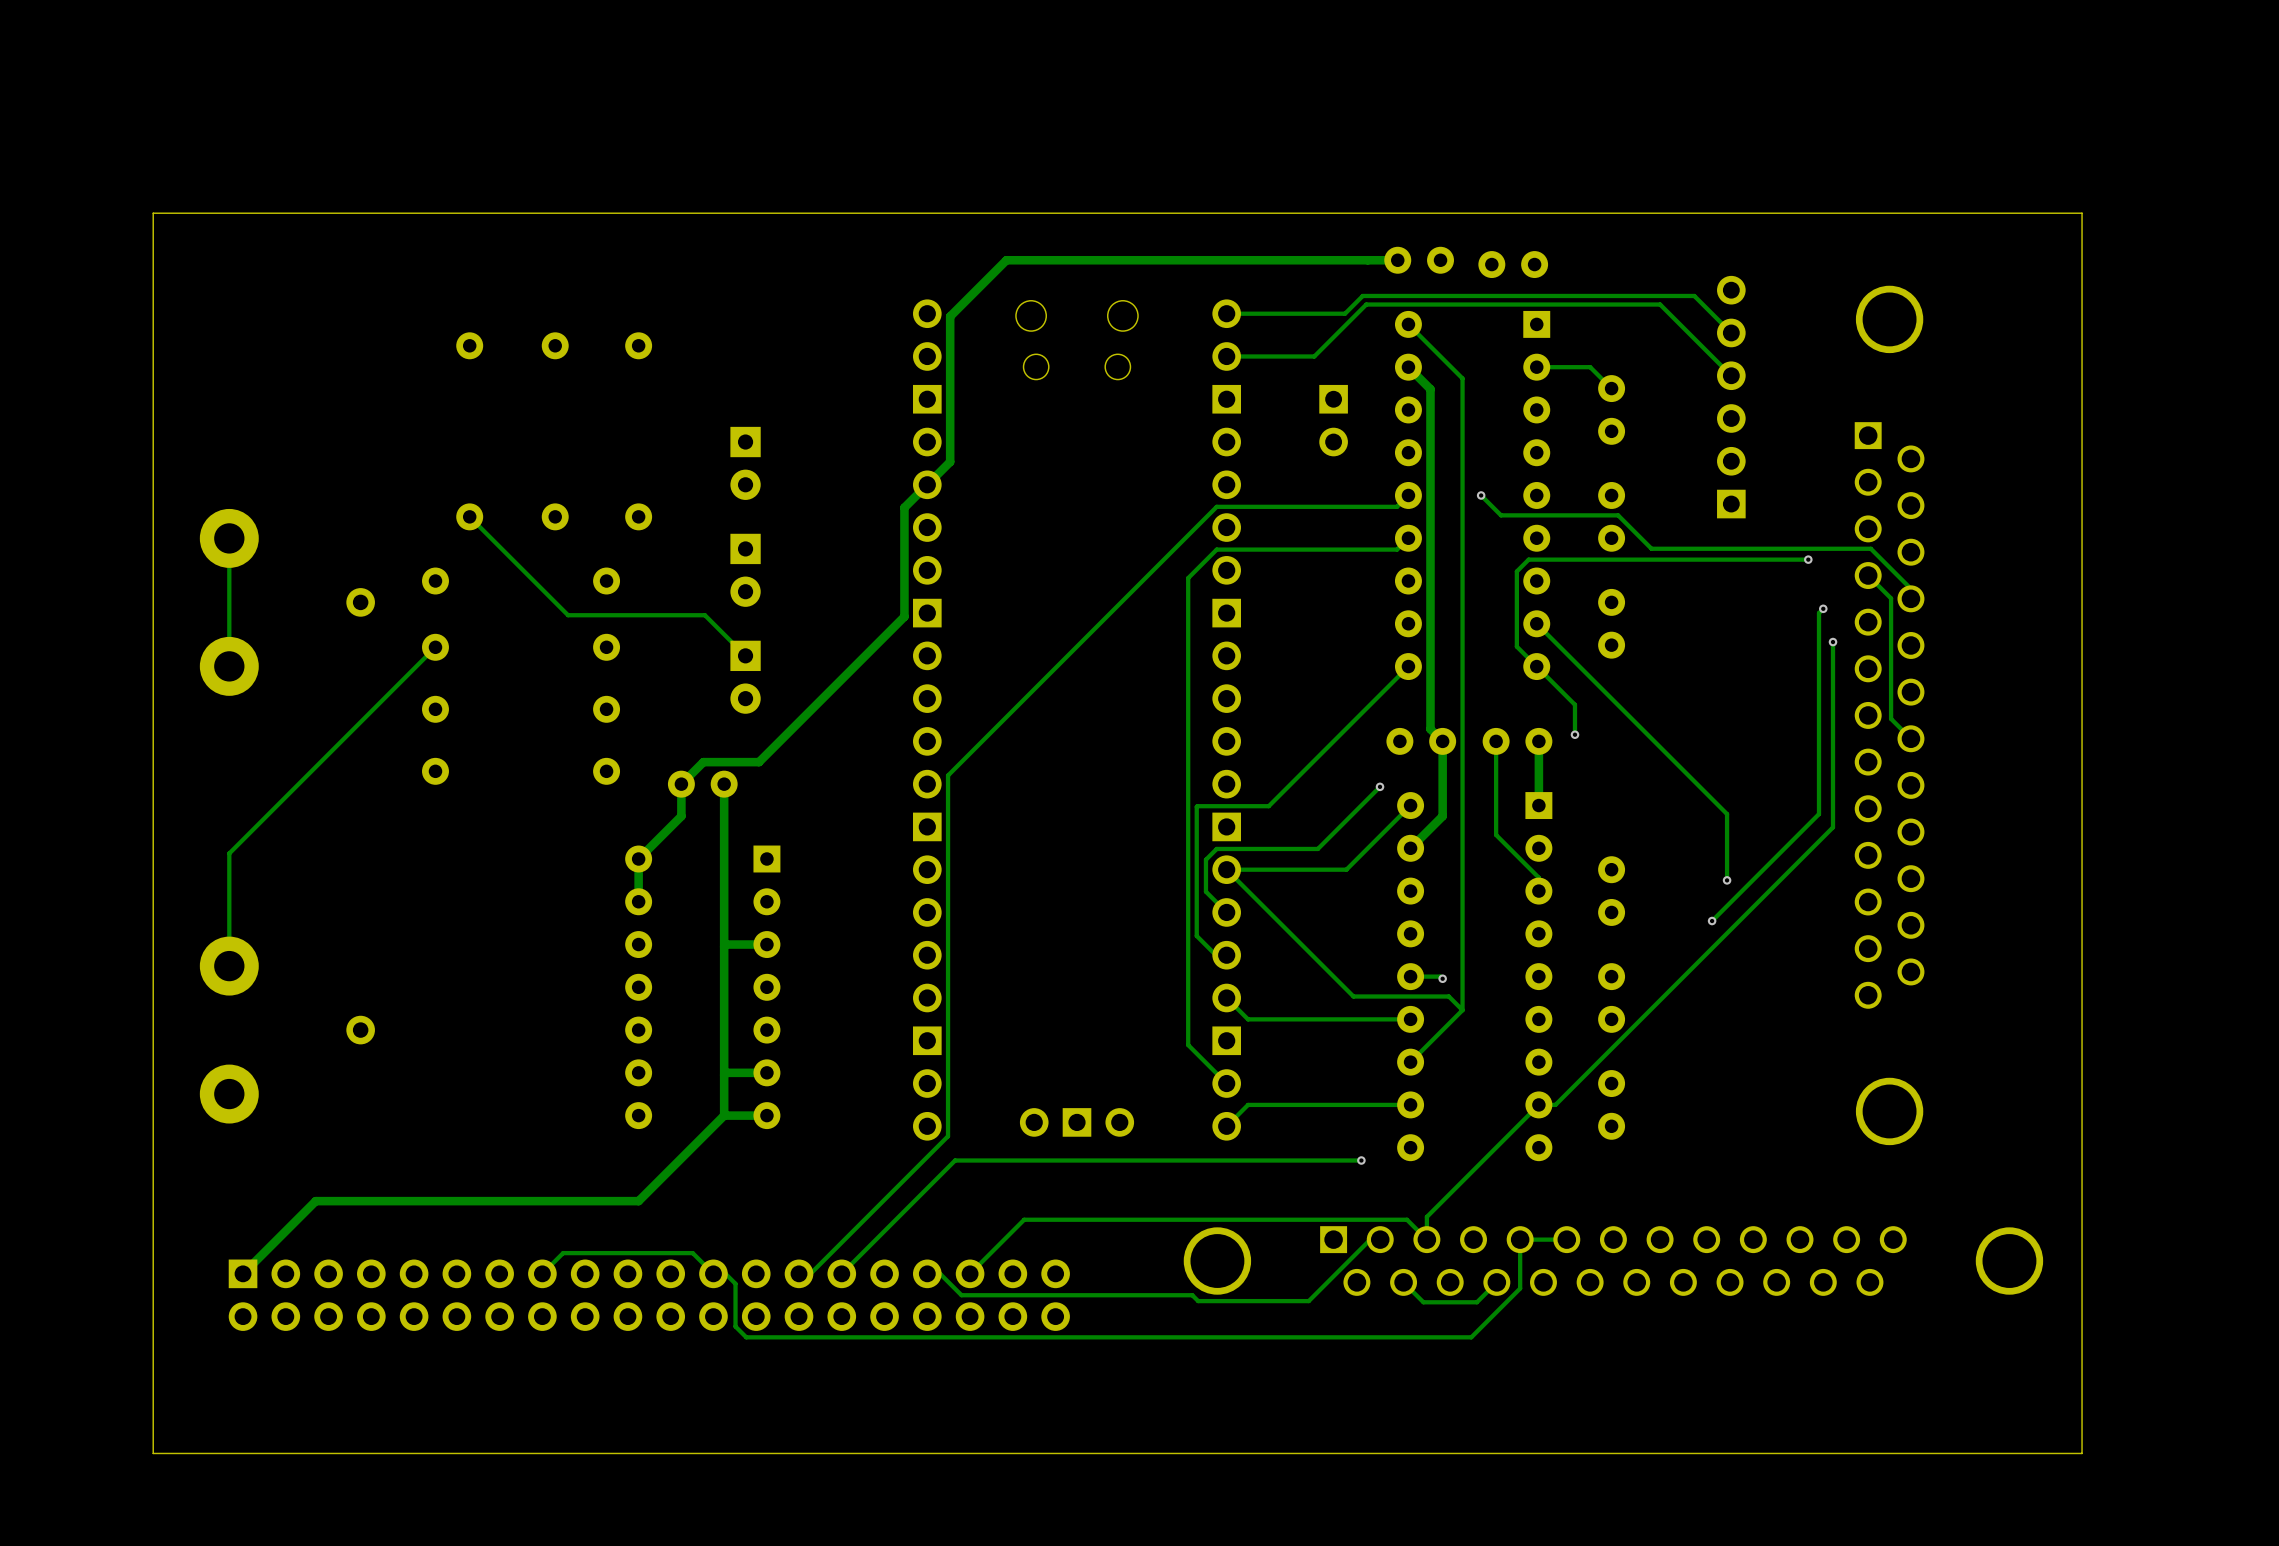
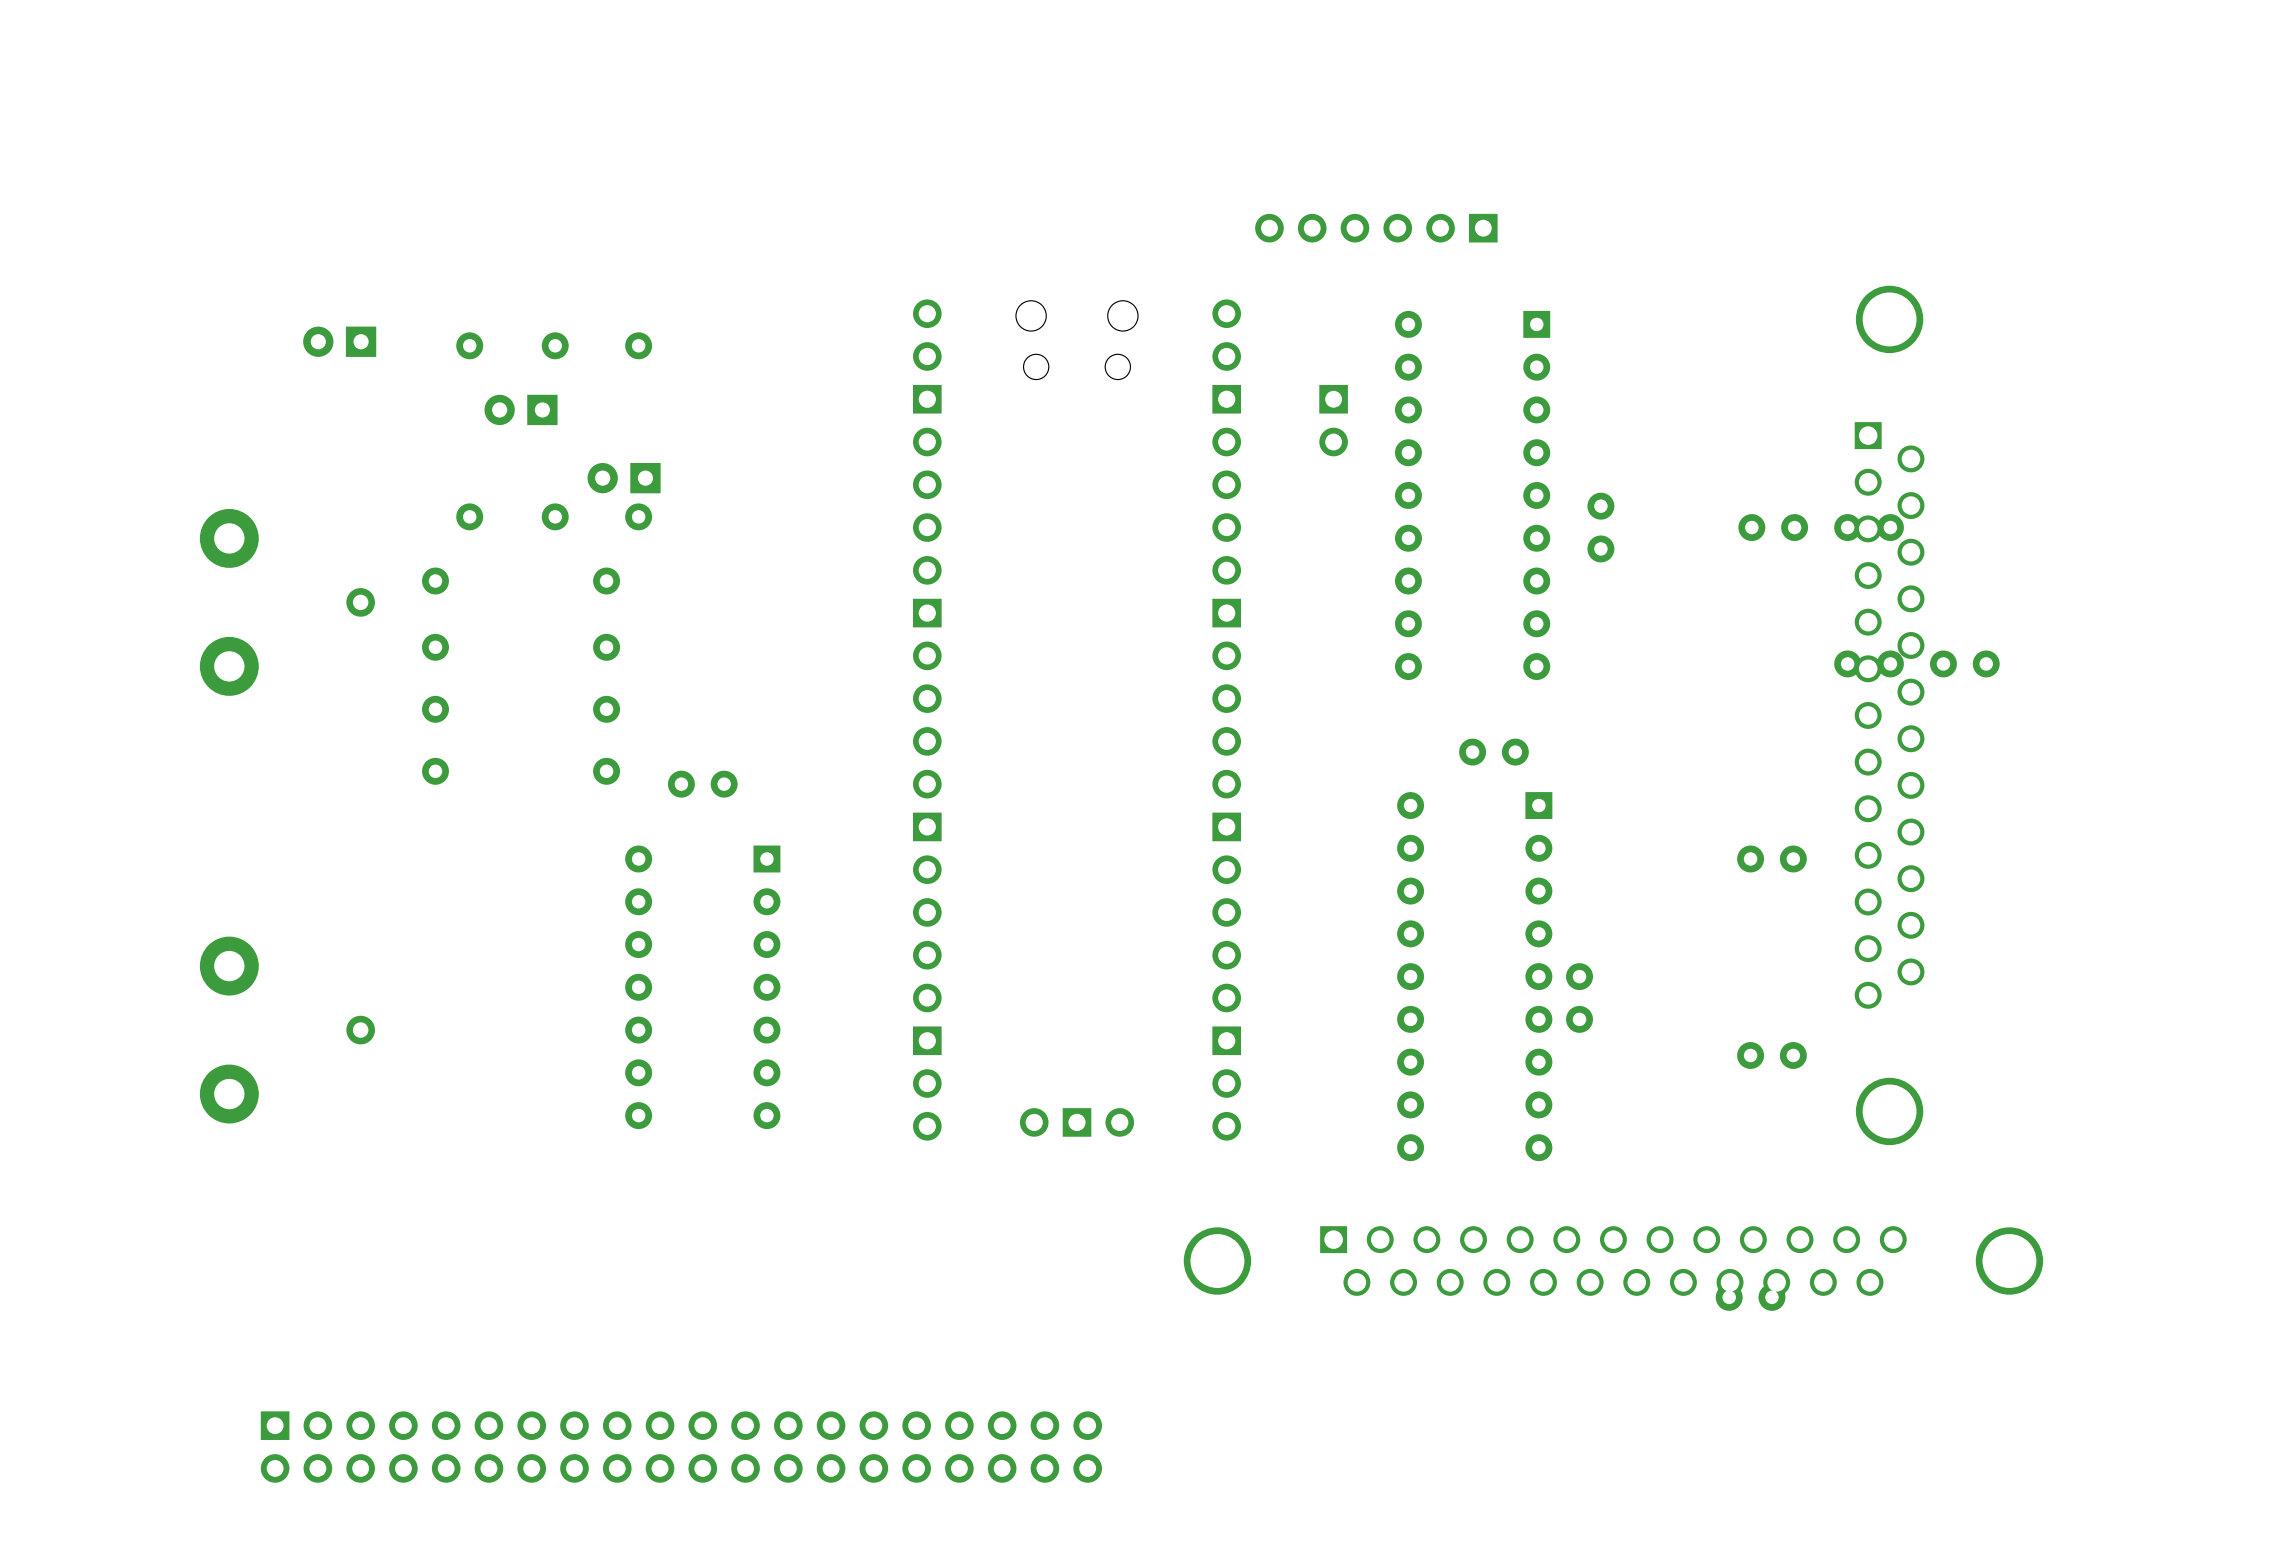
board edge: (2082, 213) (153, 213) (153, 1453) (2082, 1453) (2082, 213) -> none
track: (1397, 260) (1006, 260) (950, 316) (950, 461) (904, 507) (904, 616) (759, 762) (703, 762) (681, 784) (681, 816) (638, 859) (638, 901) -> none
part: (1419, 260) -> none
part: (1513, 264) -> none
track: (1226, 313) (1345, 313) (1362, 295) (1694, 295) (1731, 332) -> none
track: (1408, 324) (1462, 378) (1462, 1010) -> none
part: none -> (339, 341)
track: (1226, 356) (1314, 356) (1366, 304) (1660, 304) (1731, 375) -> none
track: (1408, 367) (1430, 389) (1430, 729) (1442, 741) (1442, 816) (1410, 848) -> none
track: (1536, 367) (1590, 367) (1611, 388) -> none
part rotation: 0° (1731, 397) -> 90° counterclockwise (1376, 228)
part position: (1731, 397) -> (1376, 228)
part: none -> (521, 409)
part: (1611, 409) -> none
part: (745, 463) -> none
part: none -> (624, 478)
track: (1408, 489) (1408, 495) (1397, 506) (1216, 506) (948, 775) (948, 1136) (810, 1273) (799, 1273) -> none
track: (1481, 495) (1501, 515) (1618, 515) (1651, 548) (1870, 548) (1910, 588) (1910, 598) -> none
via: (1481, 495) -> none
track: (469, 516) (568, 615) (704, 615) (745, 655) -> none
part position: (1611, 516) -> (1600, 527)
part: none -> (1773, 527)
part: none -> (1869, 527)
track: (229, 538) (229, 666) -> none
track: (1408, 538) (1397, 549) (1216, 549) (1188, 578) (1188, 1045) (1226, 1083) -> none
track: (1808, 559) (1528, 559) (1516, 571) (1516, 646) (1574, 704) (1574, 734) -> none
via: (1808, 559) -> none
part: (745, 570) -> none
track: (1868, 575) (1891, 598) (1891, 718) (1910, 738) -> none
track: (1823, 608) (1819, 613) (1819, 814) (1712, 921) -> none
via: (1823, 608) -> none
track: (1536, 623) (1727, 814) (1727, 880) -> none
part: (1611, 623) -> none
track: (1833, 642) (1833, 827) (1555, 1104) (1538, 1104) (1426, 1216) (1426, 1239) (1407, 1219) (1024, 1219) (970, 1273) -> none
via: (1833, 642) -> none
track: (435, 647) (229, 853) (229, 966) -> none
part: none -> (1869, 663)
part: none -> (1964, 663)
track: (1408, 666) (1268, 806) (1196, 806) (1196, 935) (1215, 955) (1226, 955) -> none
part: (745, 677) -> none
via: (1574, 734) -> none
part: (1421, 741) -> none
track: (1496, 741) (1496, 834) (1538, 877) (1538, 891) -> none
part position: (1517, 741) -> (1493, 752)
track: (1538, 741) (1538, 805) -> none
track: (724, 784) (724, 1115) -> none
track: (1380, 786) (1317, 848) (1216, 848) (1205, 859) (1205, 891) (1226, 912) -> none
via: (1380, 786) -> none
track: (1410, 805) (1346, 869) (1226, 869) (1353, 996) (1448, 996) (1462, 1010) -> none
part: none -> (1771, 859)
via: (1727, 880) -> none
part: (1611, 891) -> none
via: (1712, 921) -> none
track: (766, 944) (726, 944) (724, 946) -> none
track: (1410, 976) (1440, 976) (1442, 978) -> none
via: (1442, 978) -> none
track: (1226, 997) (1248, 1019) (1410, 1019) -> none
part position: (1611, 997) -> (1579, 997)
track: (1462, 1010) (1410, 1062) -> none
part: none -> (1771, 1055)
track: (766, 1072) (726, 1072) (724, 1074) -> none
track: (1410, 1104) (1248, 1104) (1226, 1126) -> none
part: (1611, 1104) -> none
track: (724, 1115) (638, 1201) (315, 1201) (243, 1273) -> none
track: (766, 1115) (724, 1115) -> none
track: (1361, 1160) (955, 1160) (841, 1273) (837, 1273) -> none
via: (1361, 1160) -> none
track: (1380, 1235) (1380, 1239) (1370, 1239) (1308, 1301) (1198, 1301) (1192, 1295) (961, 1295) (940, 1273) (927, 1273) -> none
track: (1566, 1239) (1520, 1239) (1520, 1288) (1471, 1337) (746, 1337) (735, 1326) (735, 1283) (725, 1273) (713, 1273) (692, 1253) (563, 1253) (542, 1273) -> none
track: (1496, 1282) (1476, 1302) (1423, 1302) (1403, 1282) -> none
part position: (649, 1295) -> (681, 1447)
part: none -> (1750, 1297)

